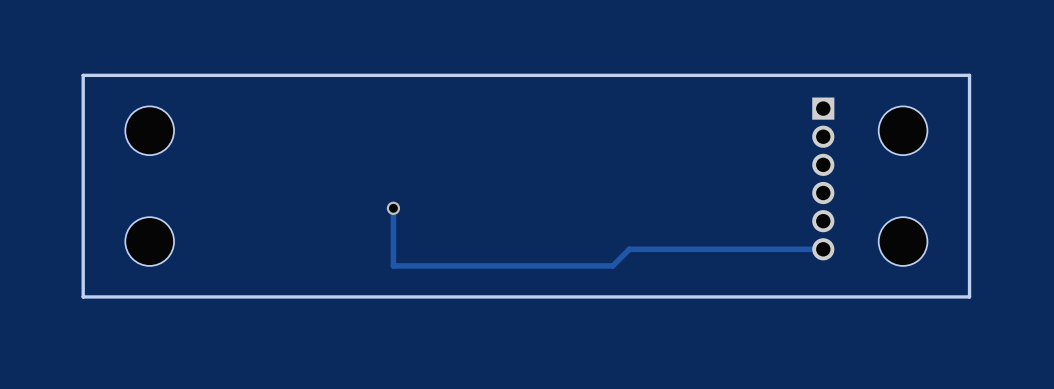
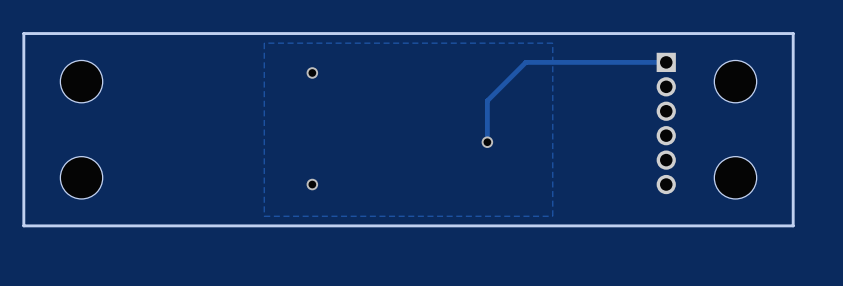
zone outline: none -> (552, 43) (552, 216) (264, 216) (264, 43) (552, 43)
track: none -> (666, 62) (525, 62) (487, 100) (487, 142)
via: none -> (312, 72)
via: none -> (487, 142)
track: (393, 208) (393, 265) (612, 265) (629, 249) (823, 249) -> none
via: (393, 208) -> none
via: none -> (312, 184)

